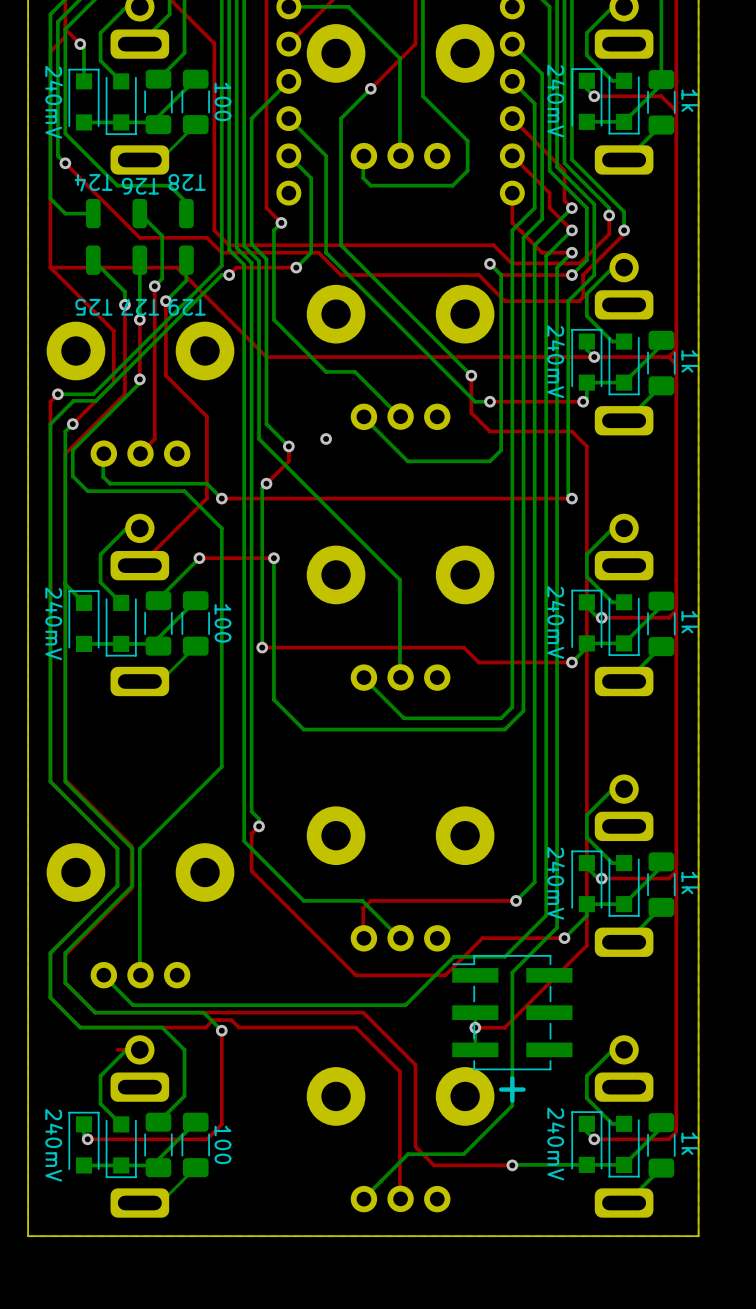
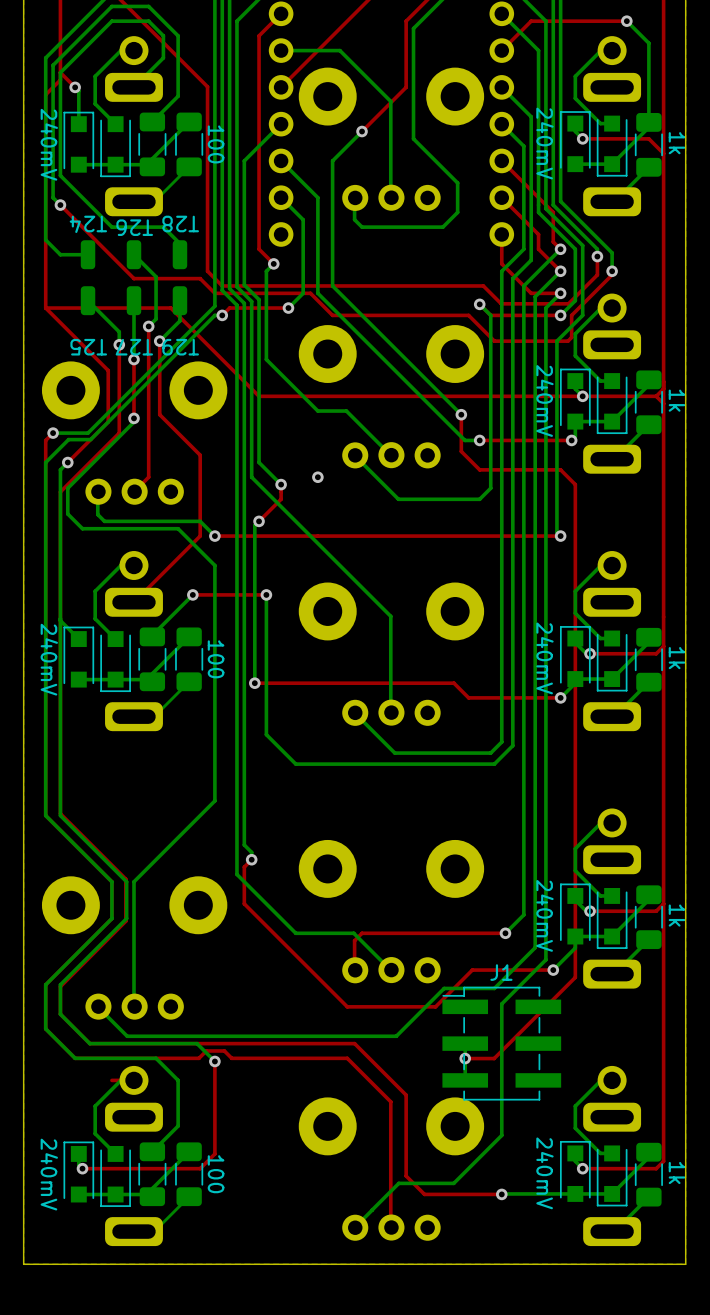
J1 name: none -> J1 (501, 972)
text: + (512, 1089) -> none

